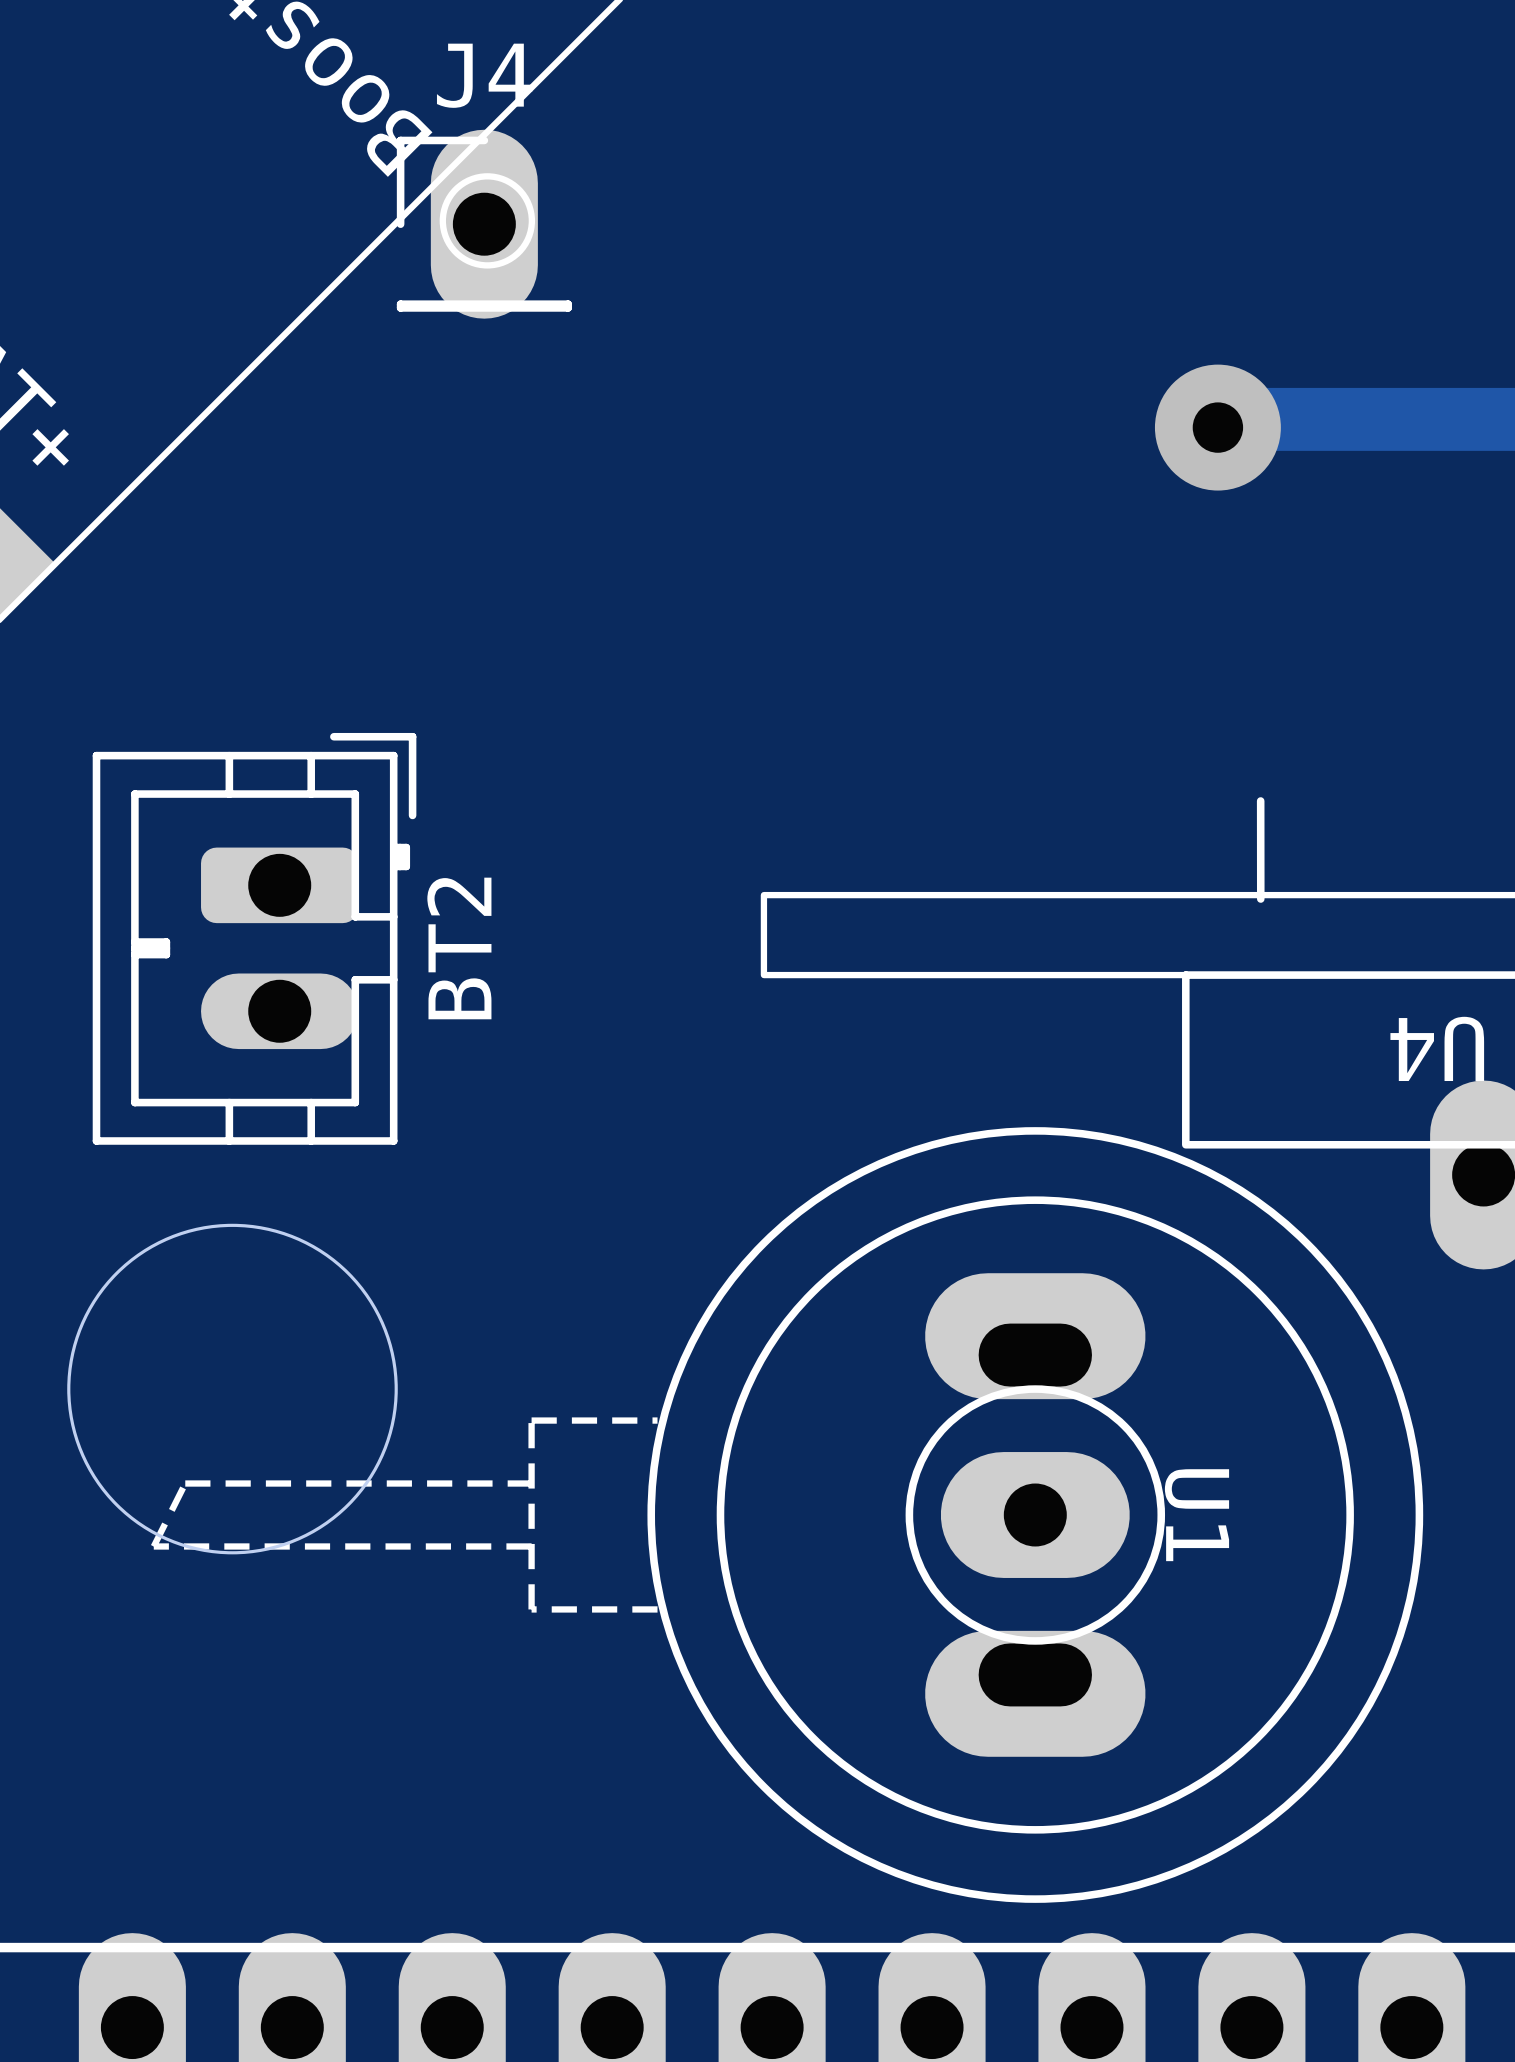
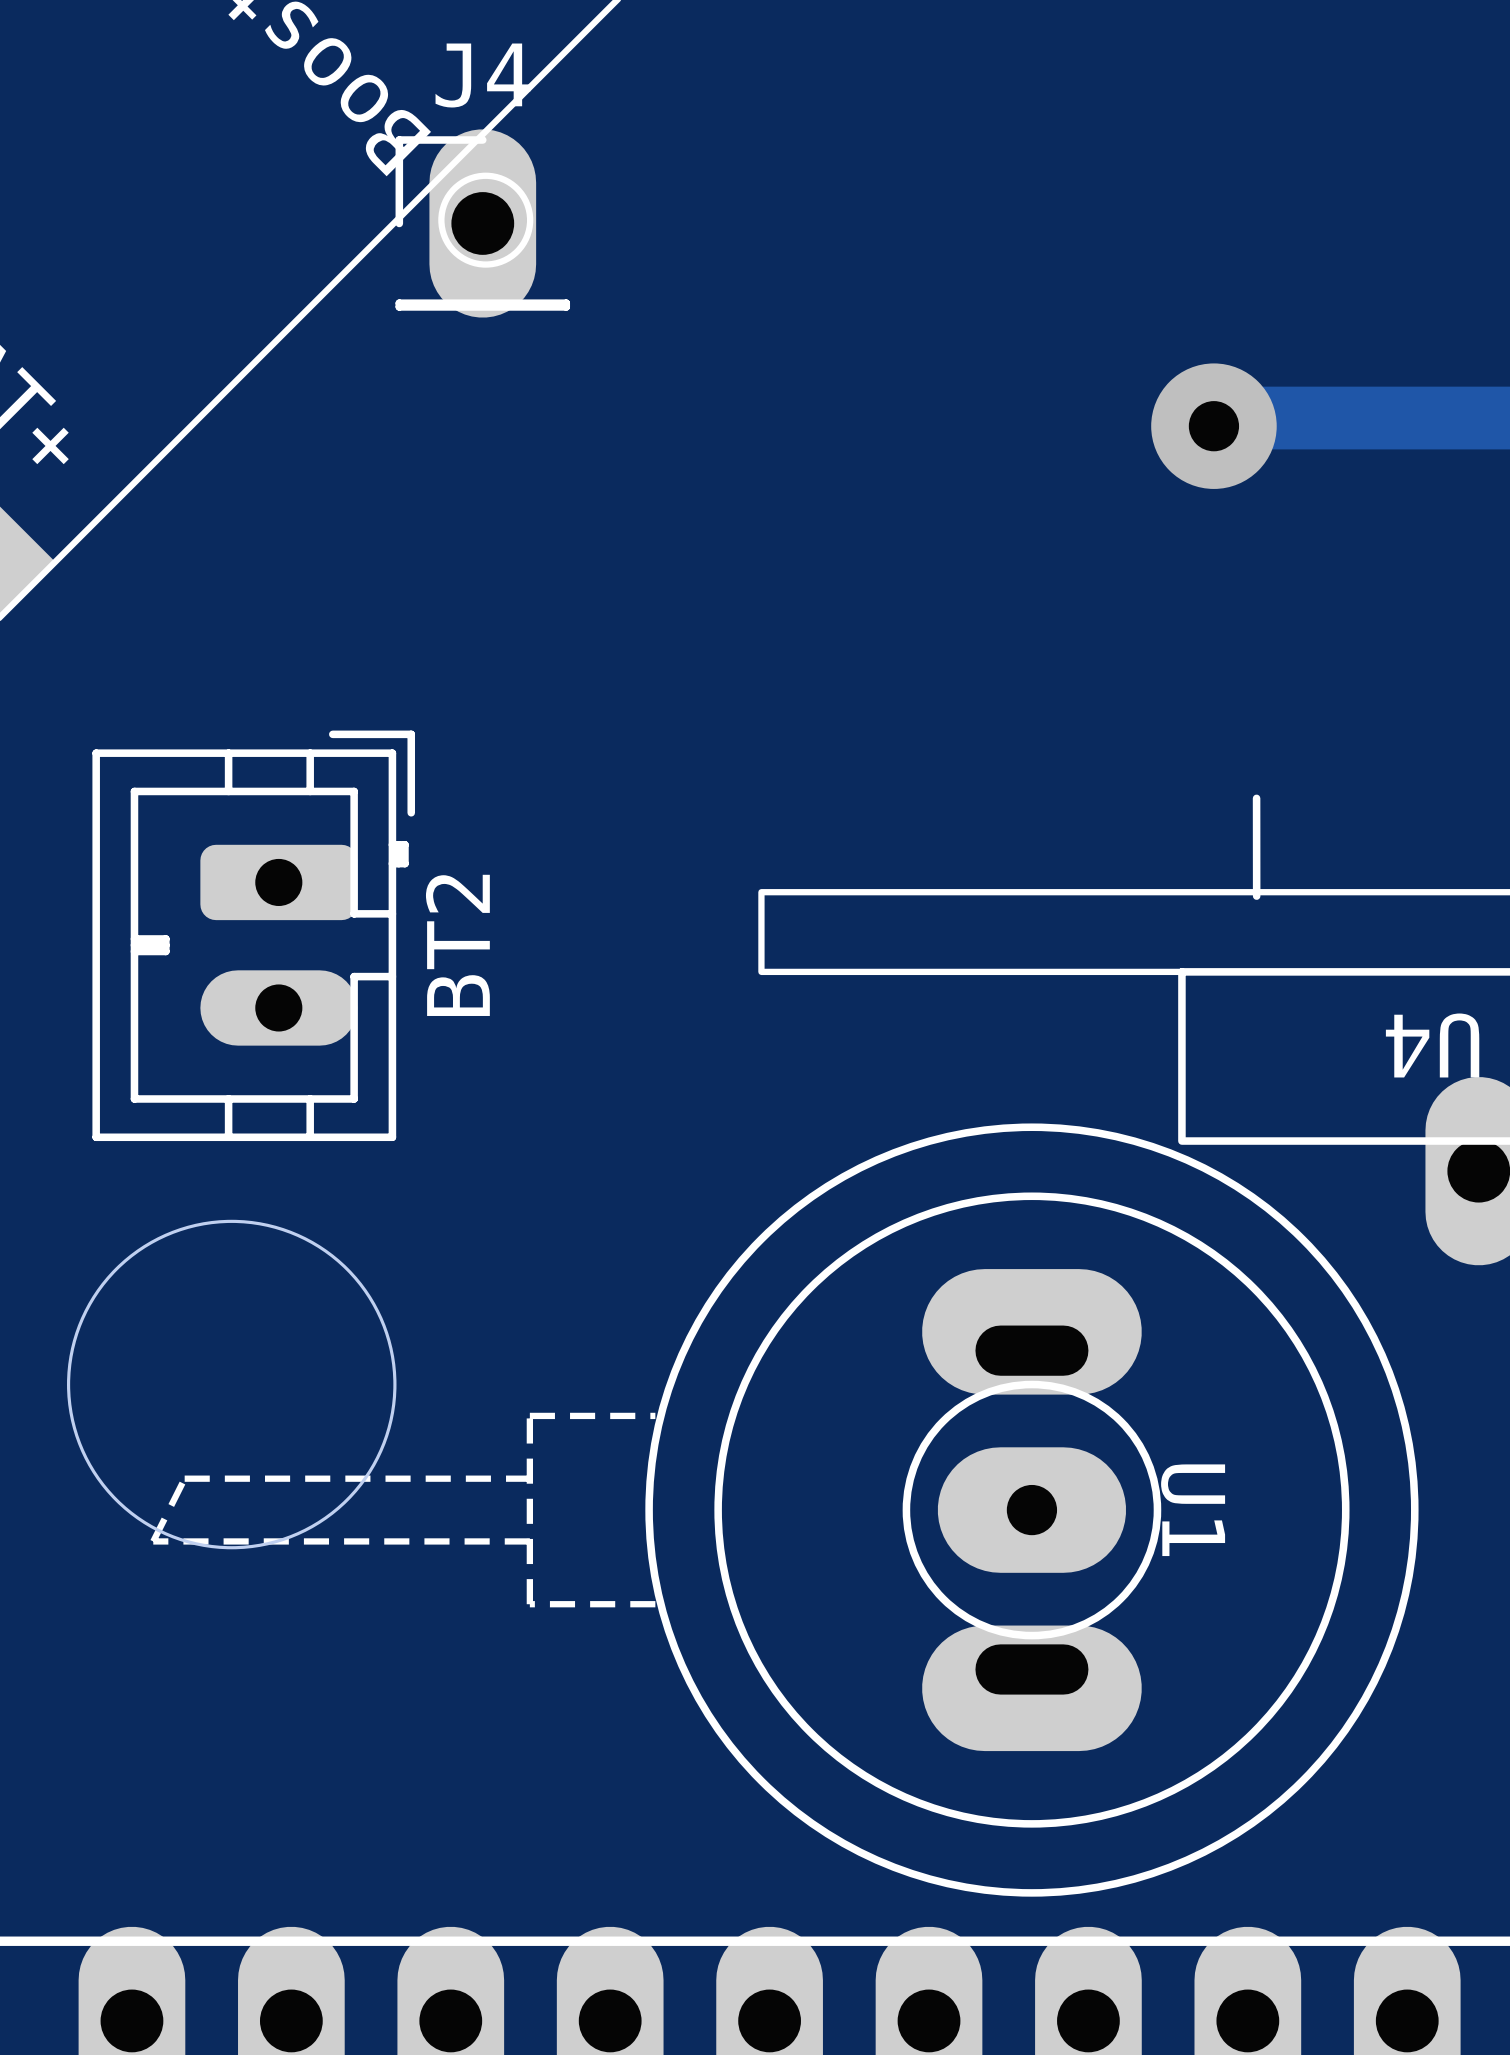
BT2 footprint: [92, 732, 417, 1145] -> [92, 730, 416, 1142]
U1 footprint: [150, 1127, 1424, 1903] -> [150, 1123, 1419, 1897]

